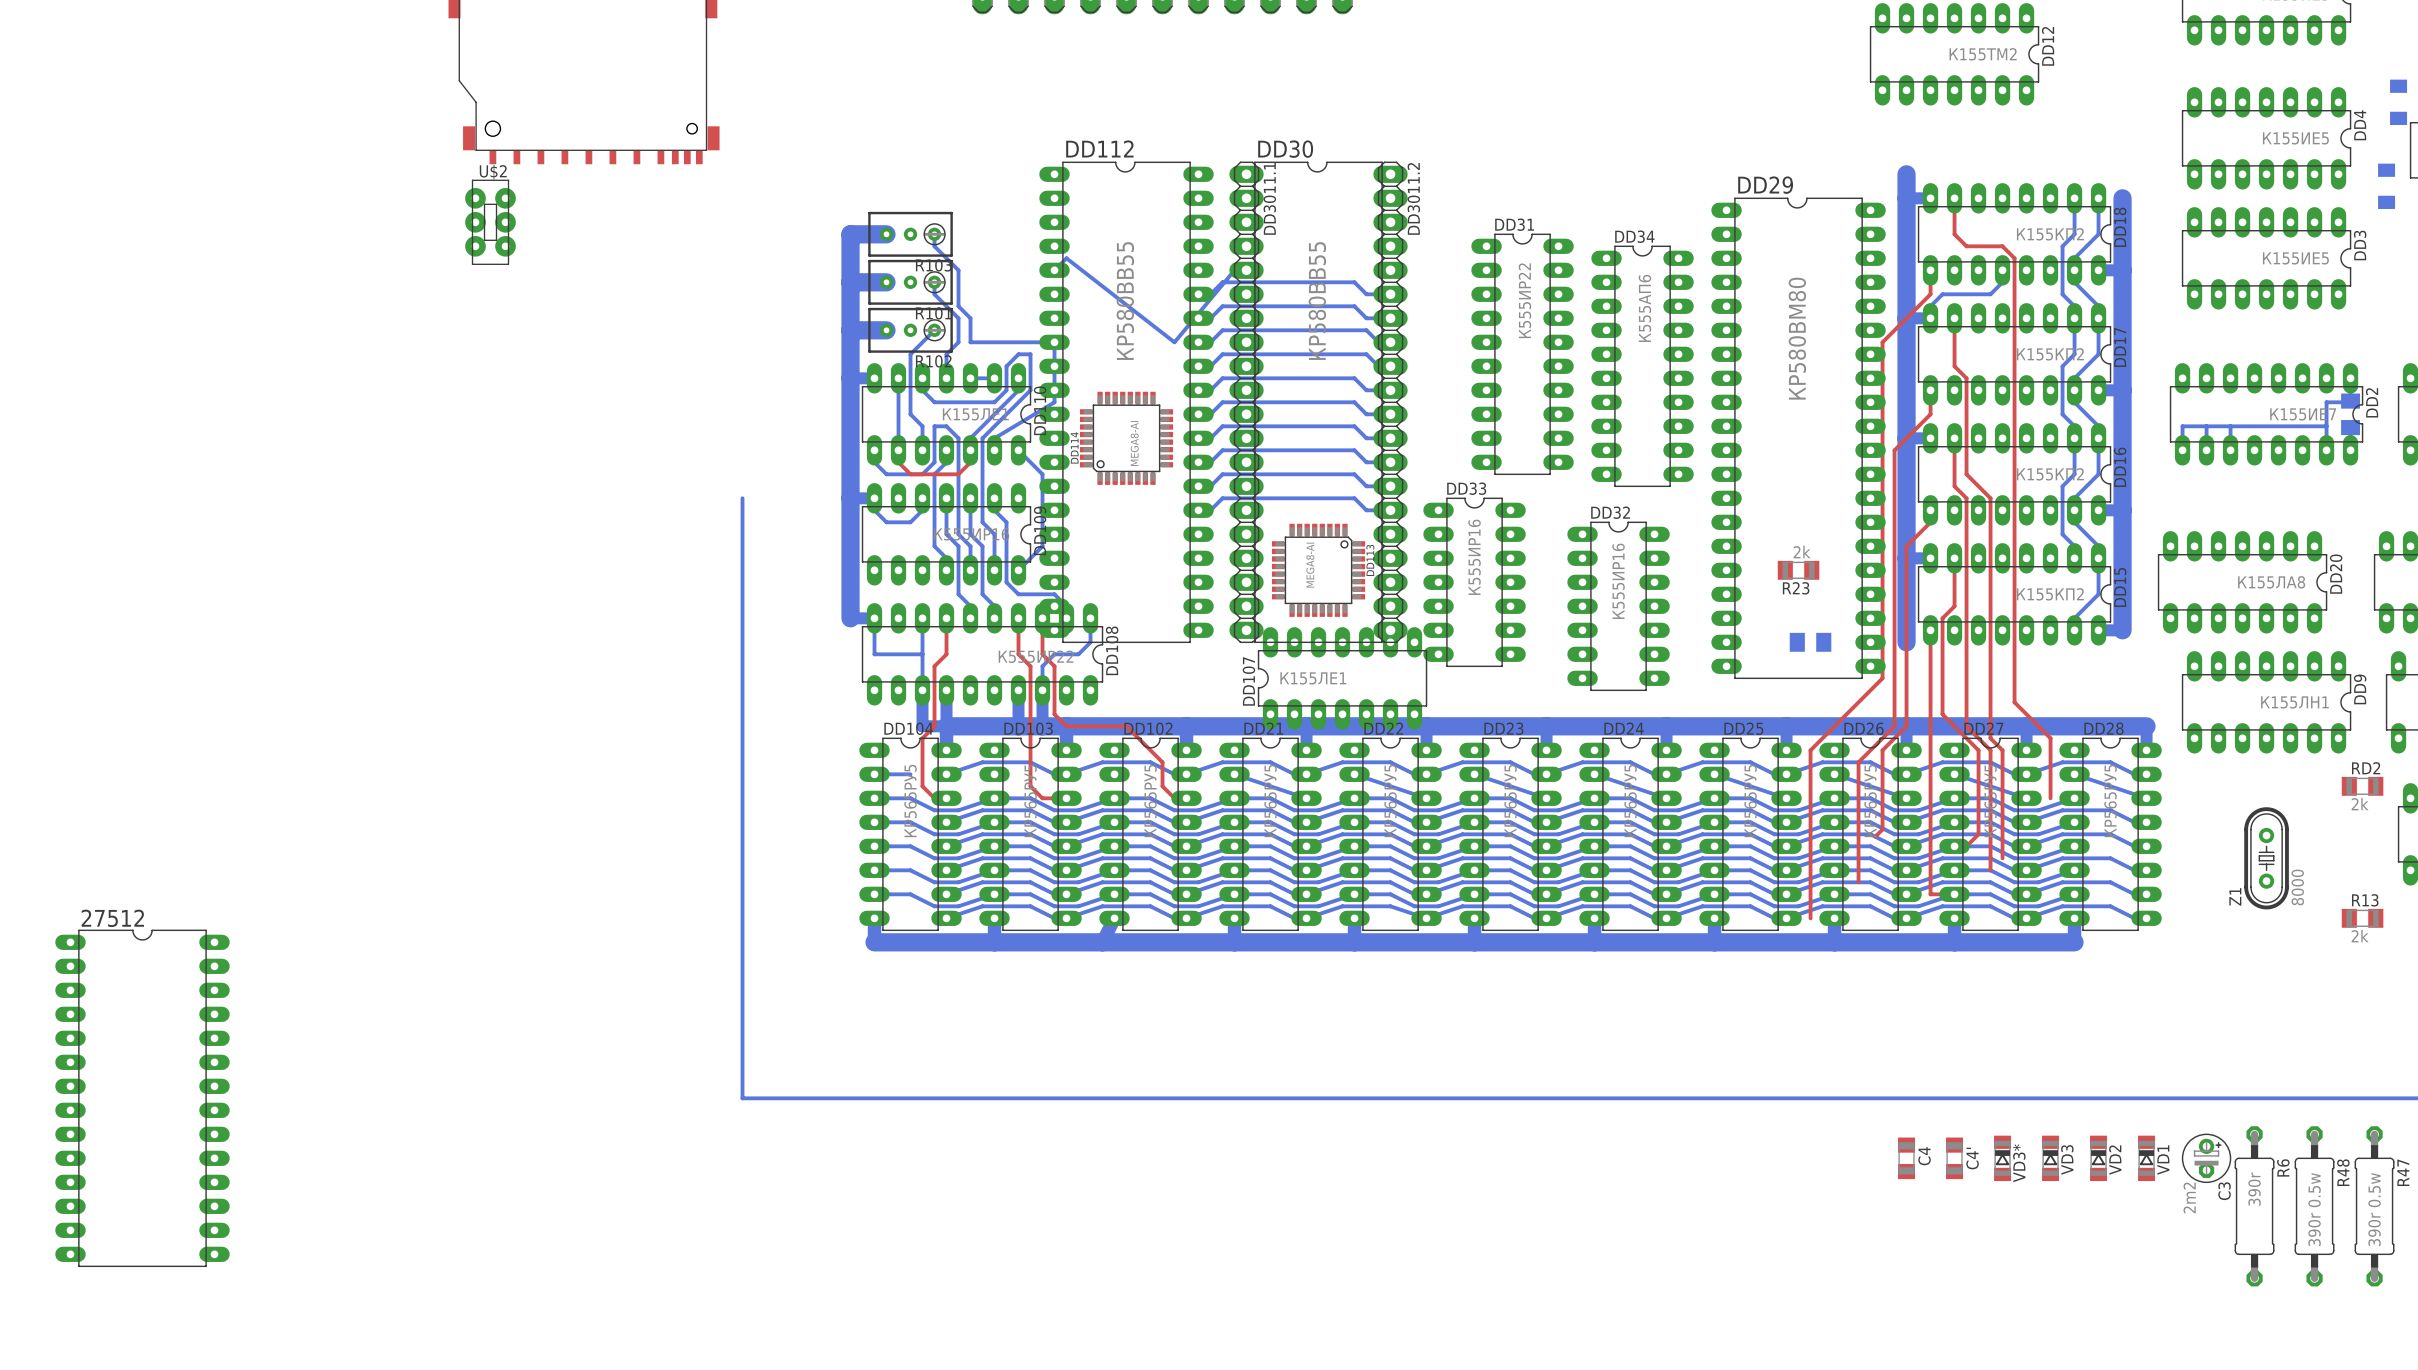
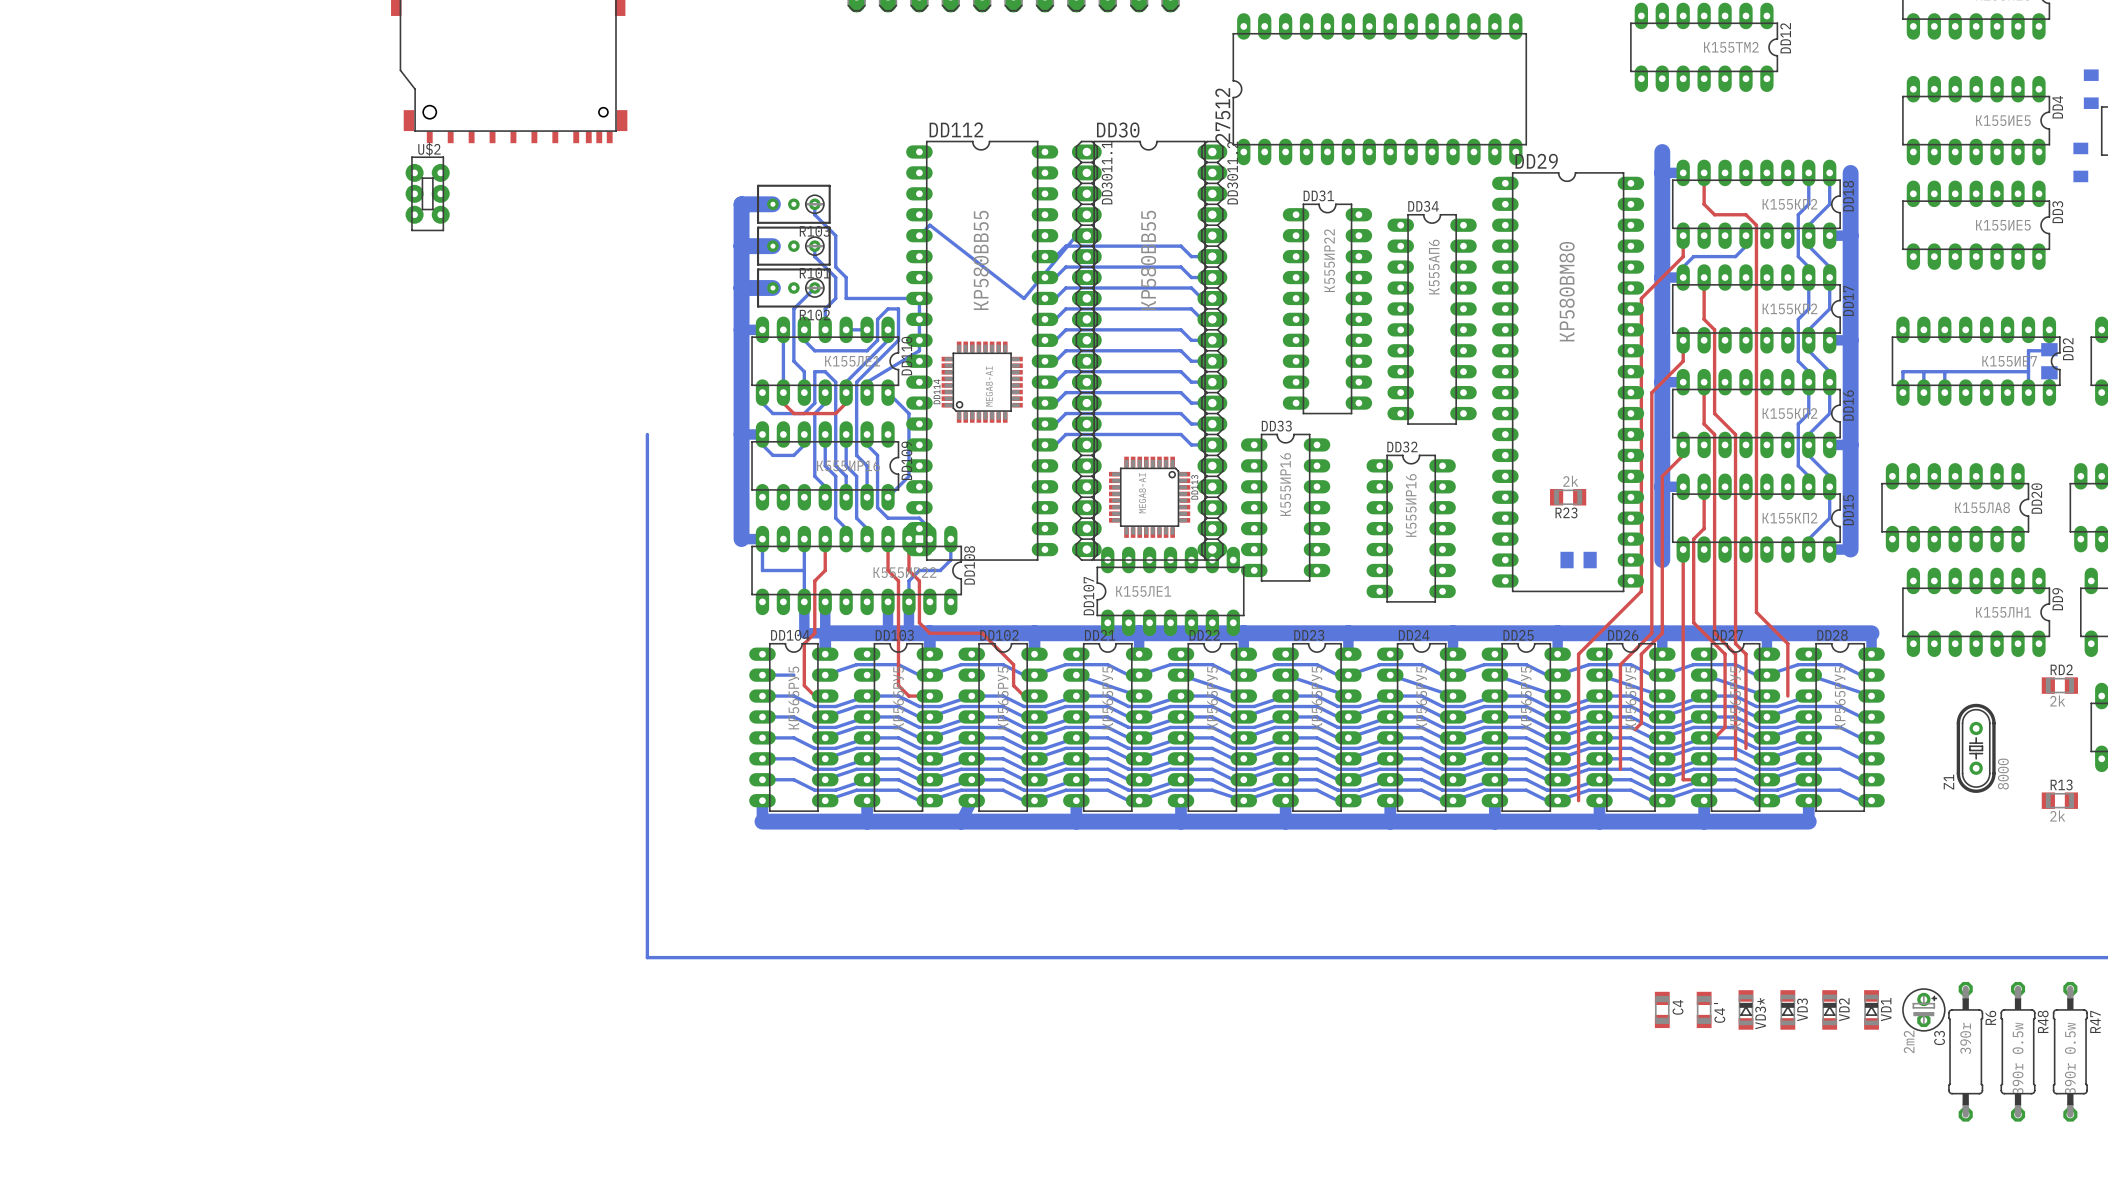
27512 rotation: 0° (142, 1098) -> 90° counterclockwise (1379, 89)
27512 position: (142, 1098) -> (1379, 89)

